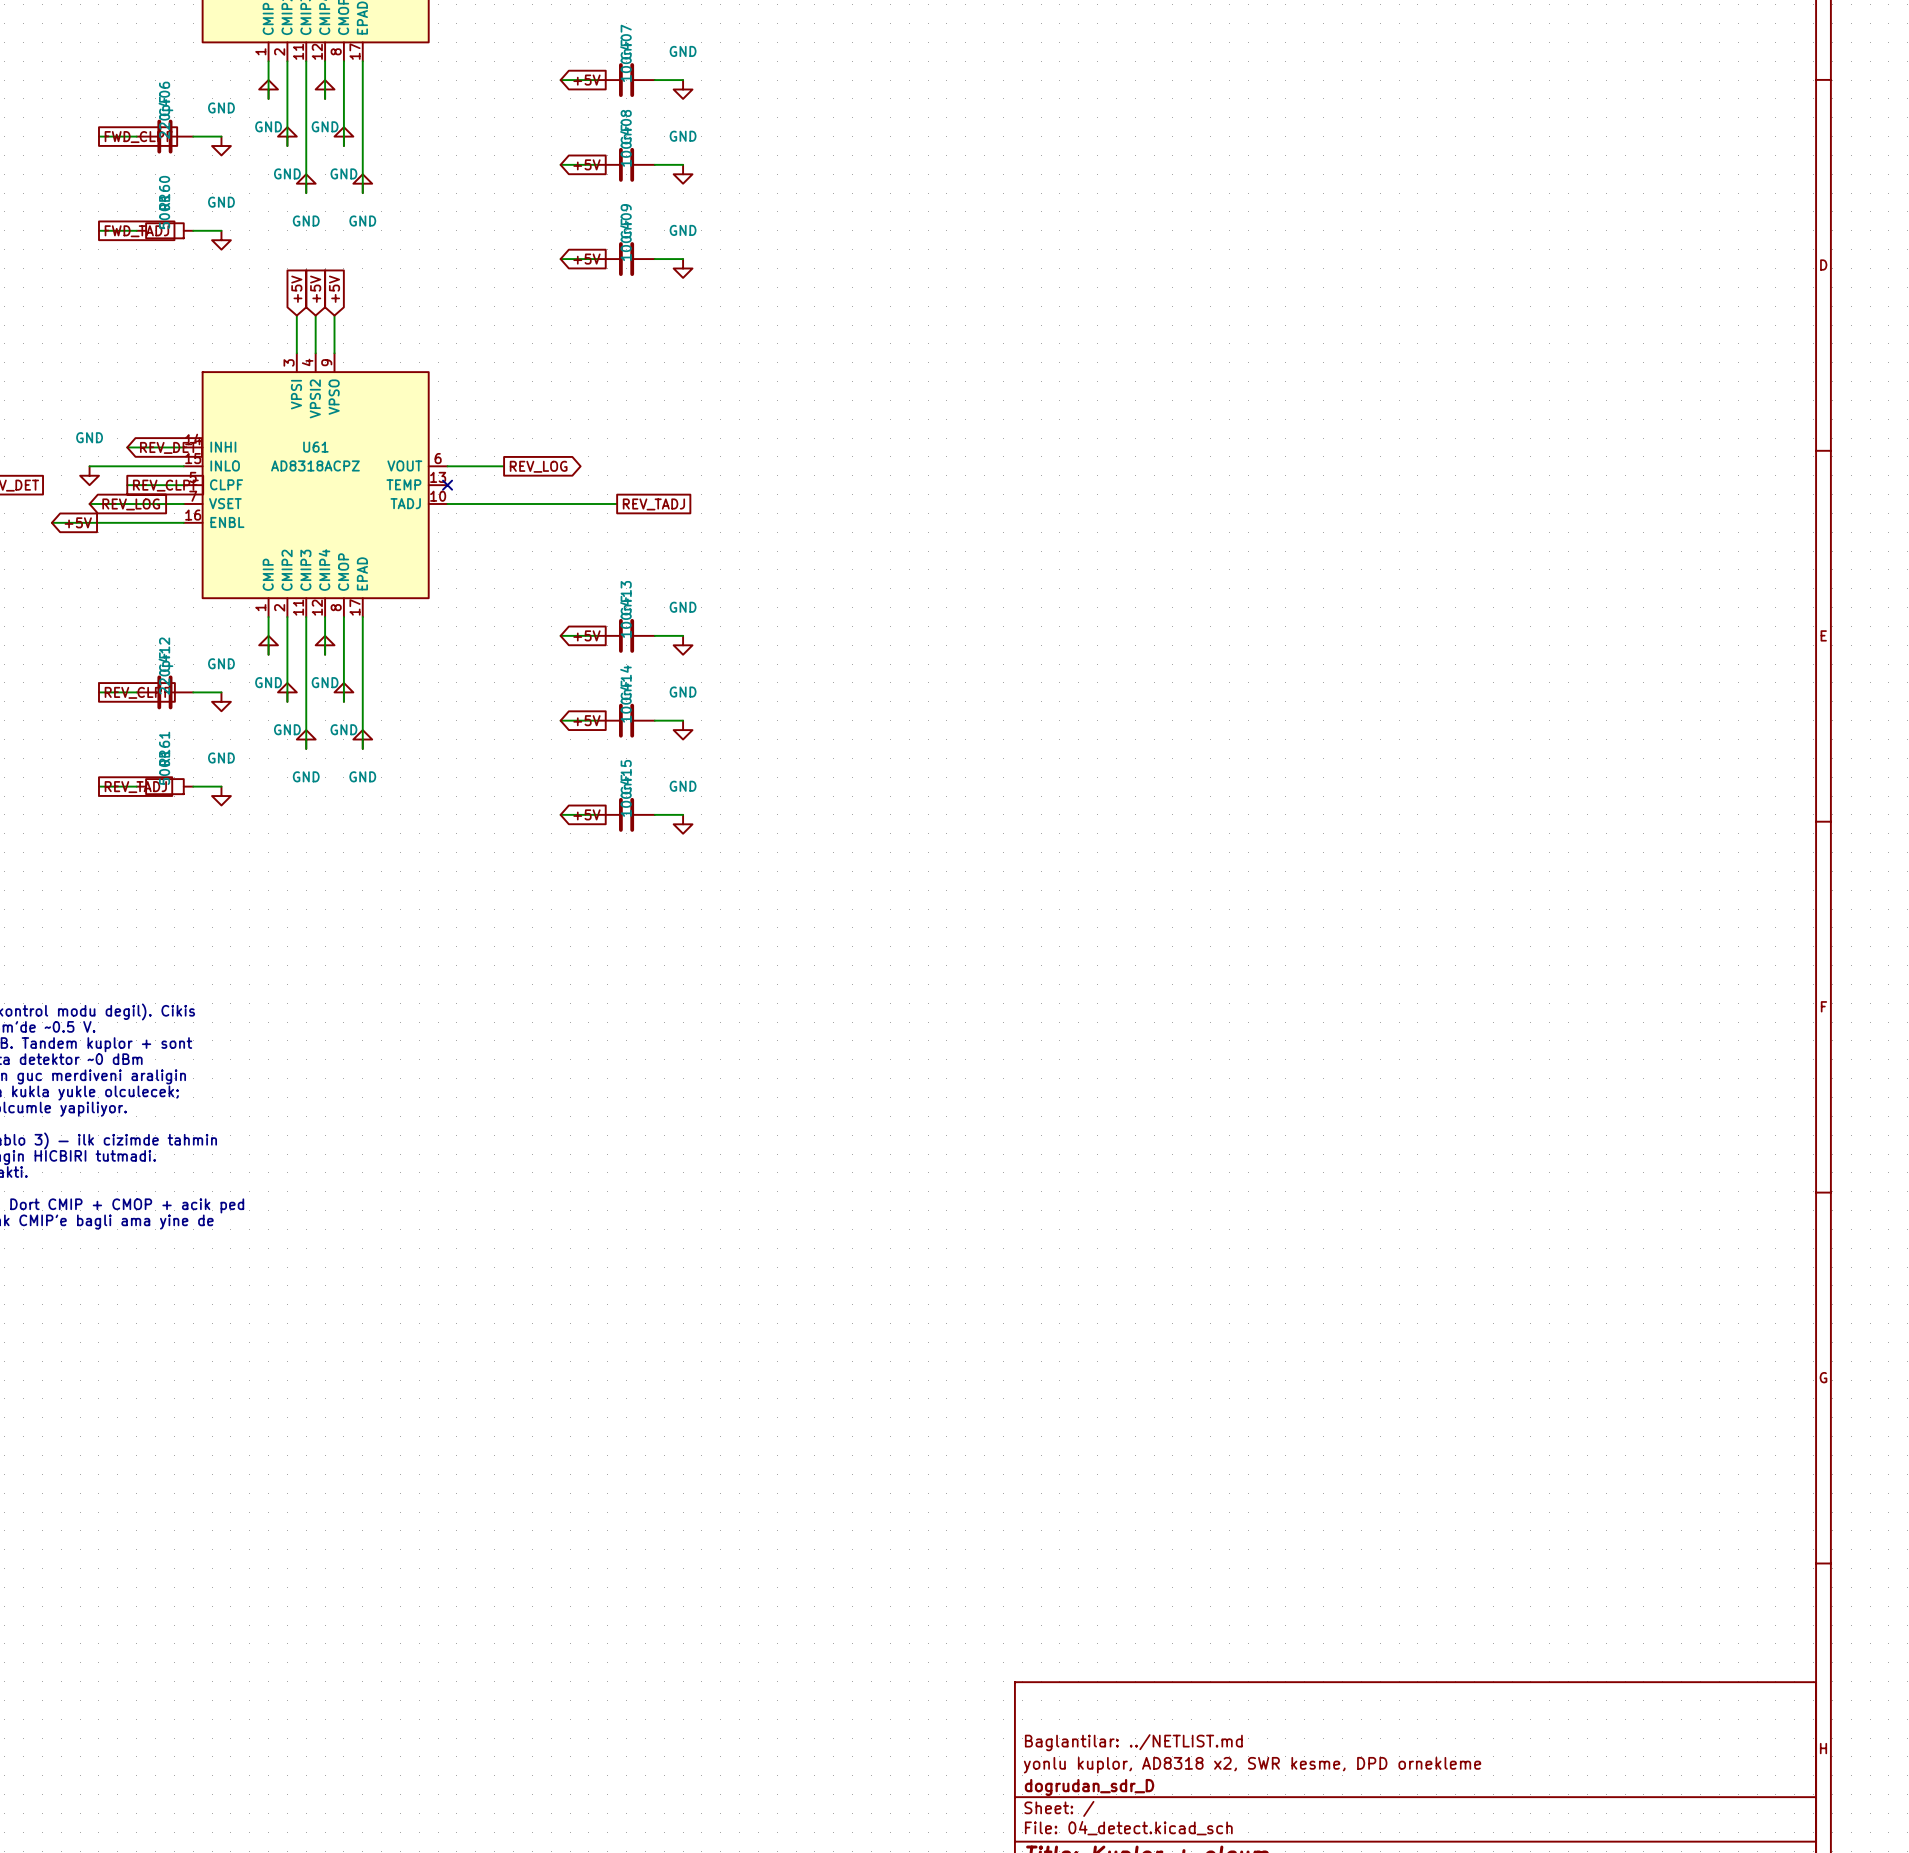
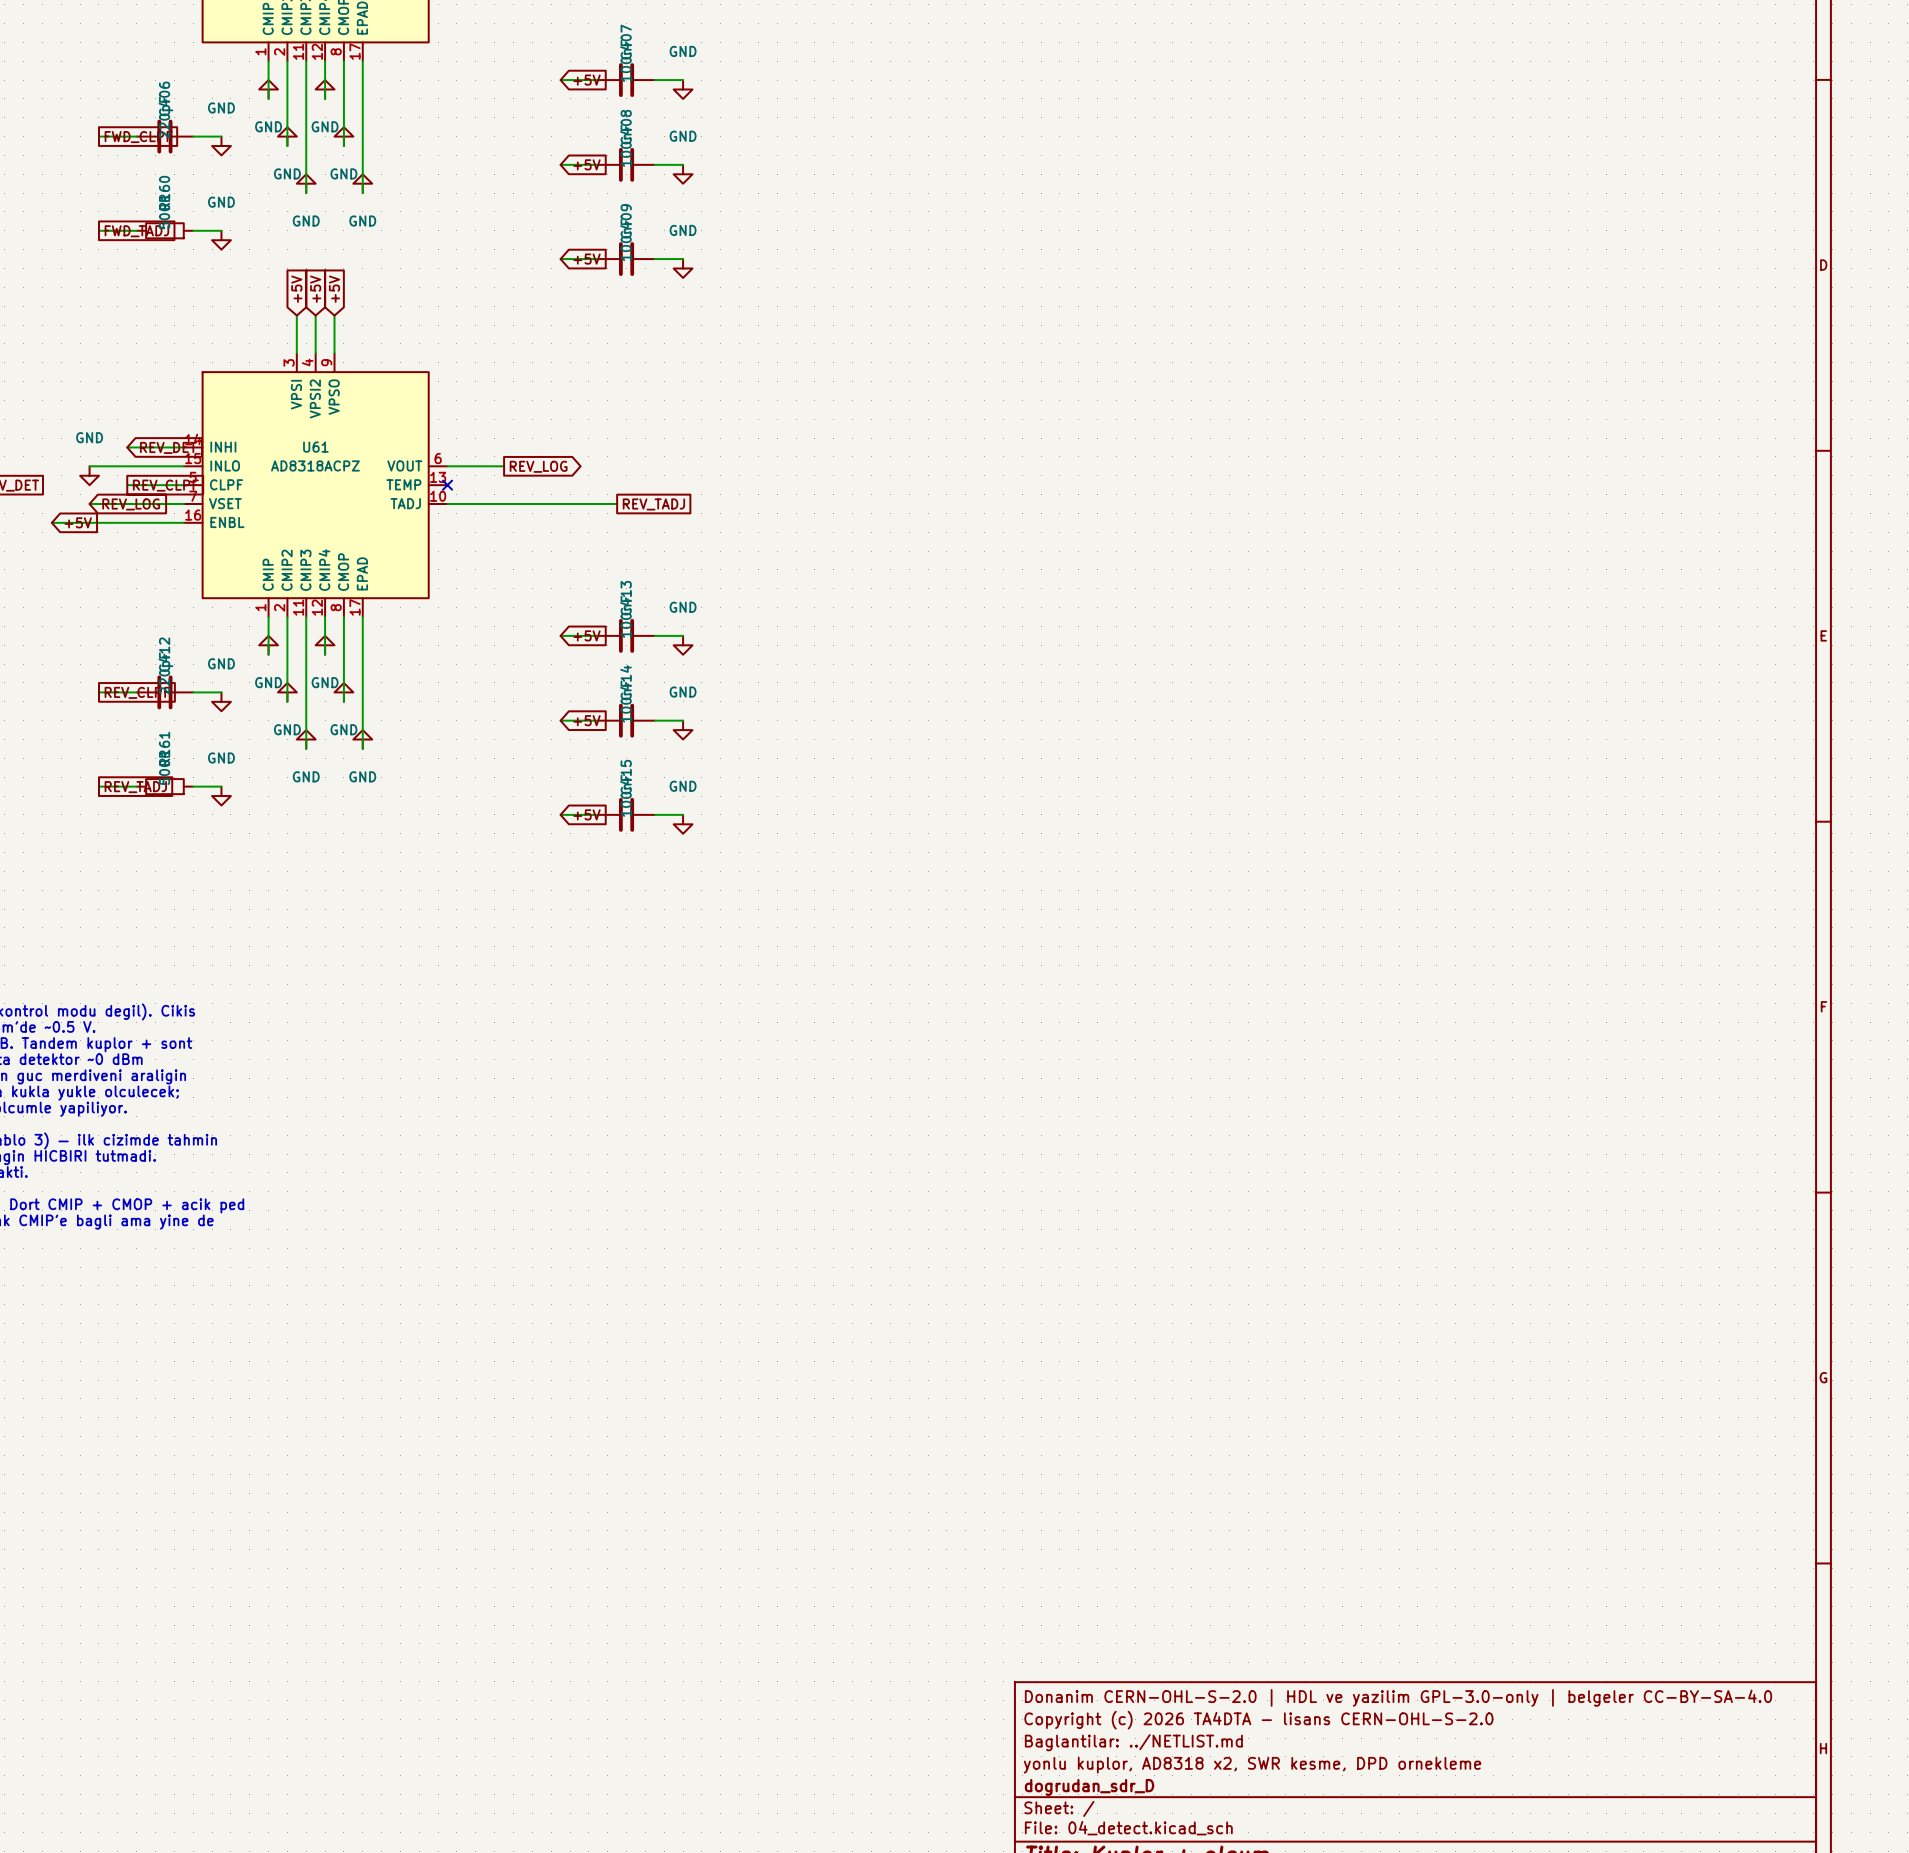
title block: none -> Donanim CERN-OHL-S-2.0 | HDL ve yazilim GPL-3.0-only | belgeler CC-BY-SA-4.0 (1398, 1697)
title block: none -> Copyright (c) 2026 TA4DTA - lisans CERN-OHL-S-2.0 (1258, 1720)

